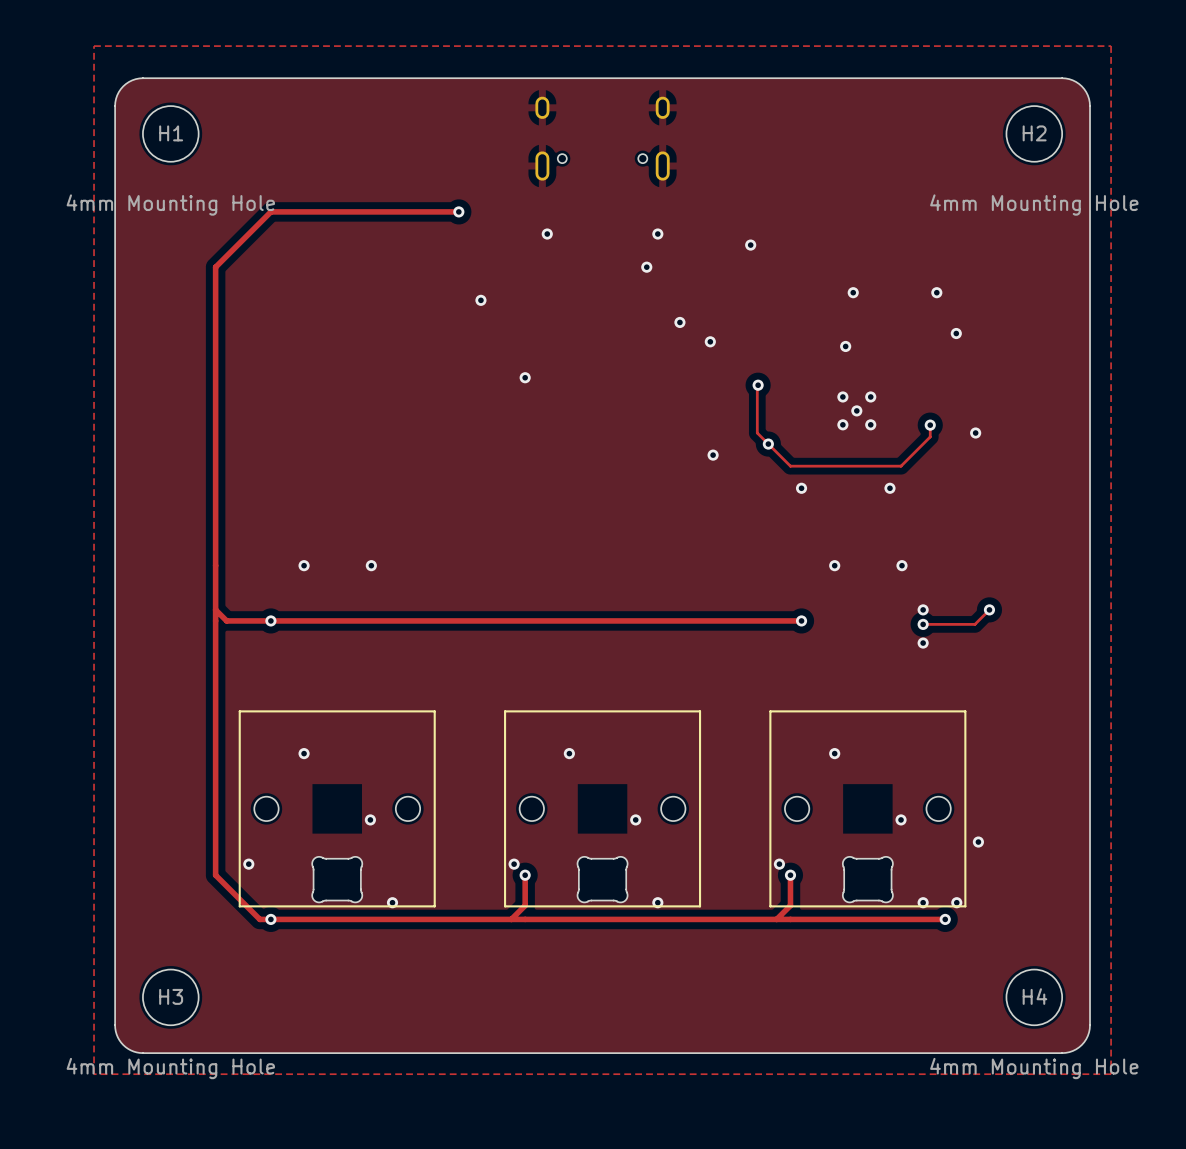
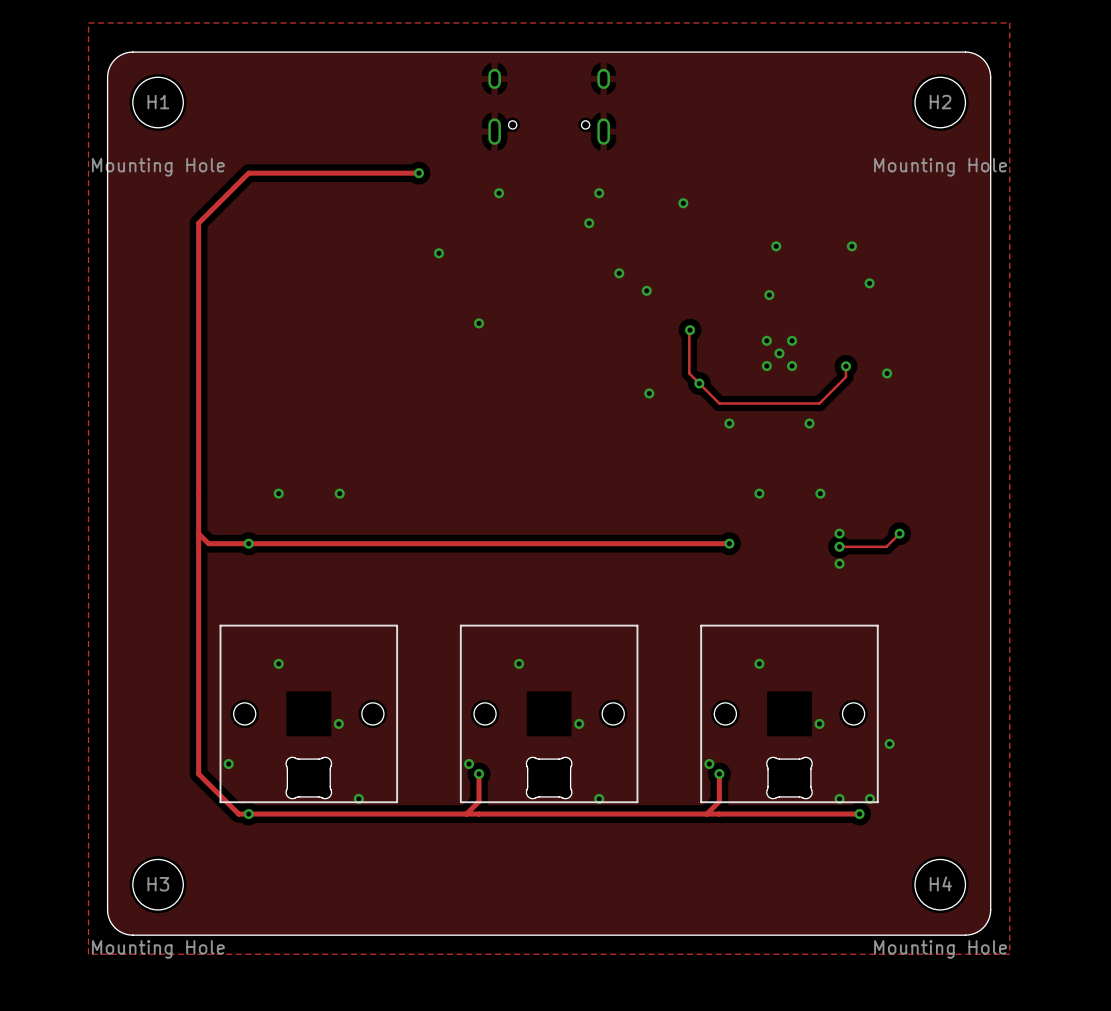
H1 value: 4mm Mounting Hole (170, 205) -> Mounting Hole (158, 167)
H2 value: 4mm Mounting Hole (1034, 205) -> Mounting Hole (940, 167)
H3 value: 4mm Mounting Hole (170, 1068) -> Mounting Hole (158, 949)
H4 value: 4mm Mounting Hole (1034, 1068) -> Mounting Hole (940, 949)

